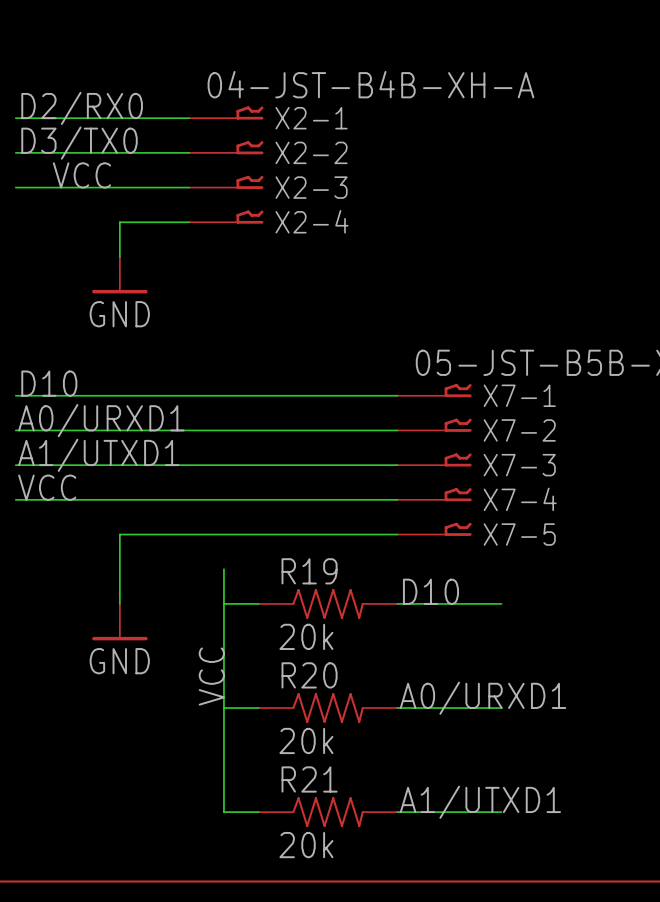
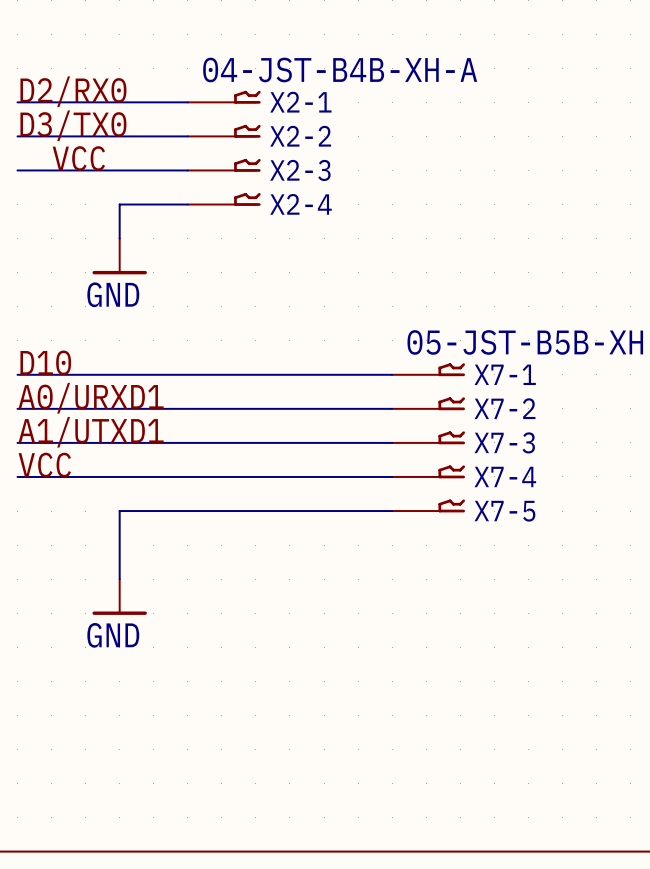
wire: (223, 569) (223, 812) (258, 812) -> none
label: D10 (430, 591) -> none
wire: (223, 603) (258, 603) -> none
R19: 20k (328, 603) -> none
wire: (397, 603) (501, 603) -> none
label: VCC (211, 676) -> none
label: A0/URXD1 (483, 698) -> none
wire: (223, 708) (258, 708) -> none
R20: 20k (328, 708) -> none
wire: (397, 708) (501, 708) -> none
label: A1/UTXD1 (480, 802) -> none
R21: 20k (328, 812) -> none
wire: (397, 812) (501, 812) -> none

